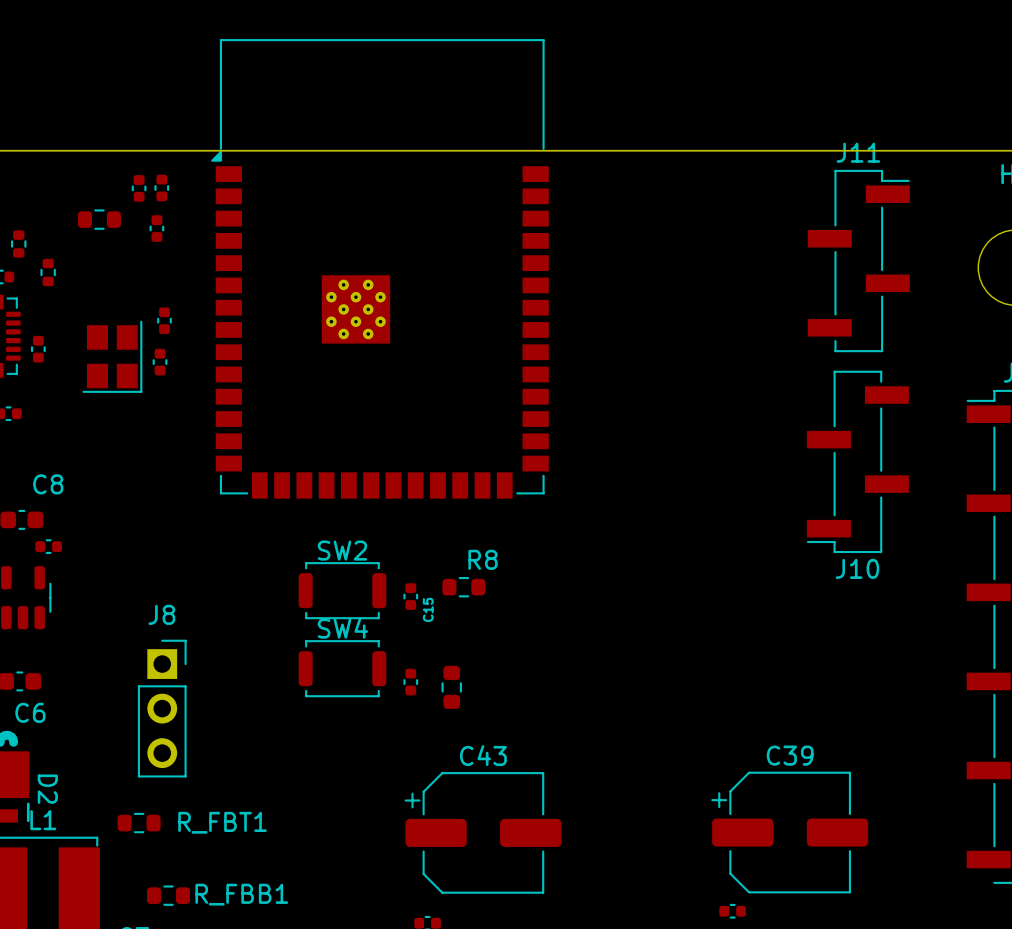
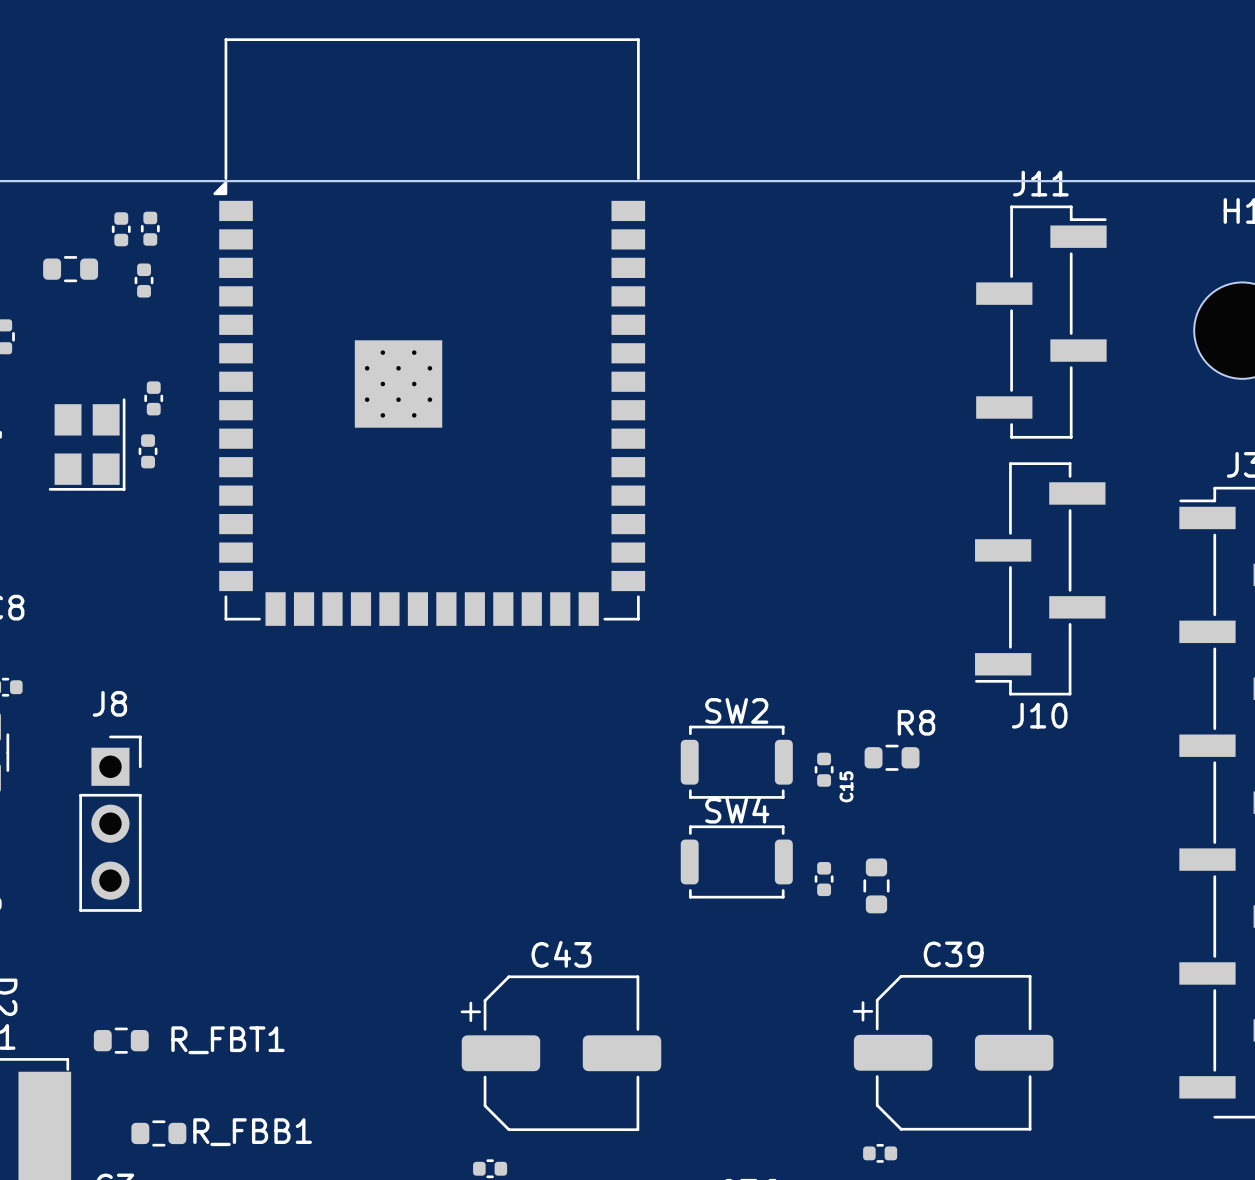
R8 position: (463, 587) -> (892, 757)
SW2 position: (342, 590) -> (736, 762)
C15 position: (410, 596) -> (824, 769)
SW4 position: (342, 668) -> (736, 861)
part position: (410, 682) -> (824, 879)
part position: (451, 687) -> (876, 885)
J8 position: (162, 708) -> (110, 823)

